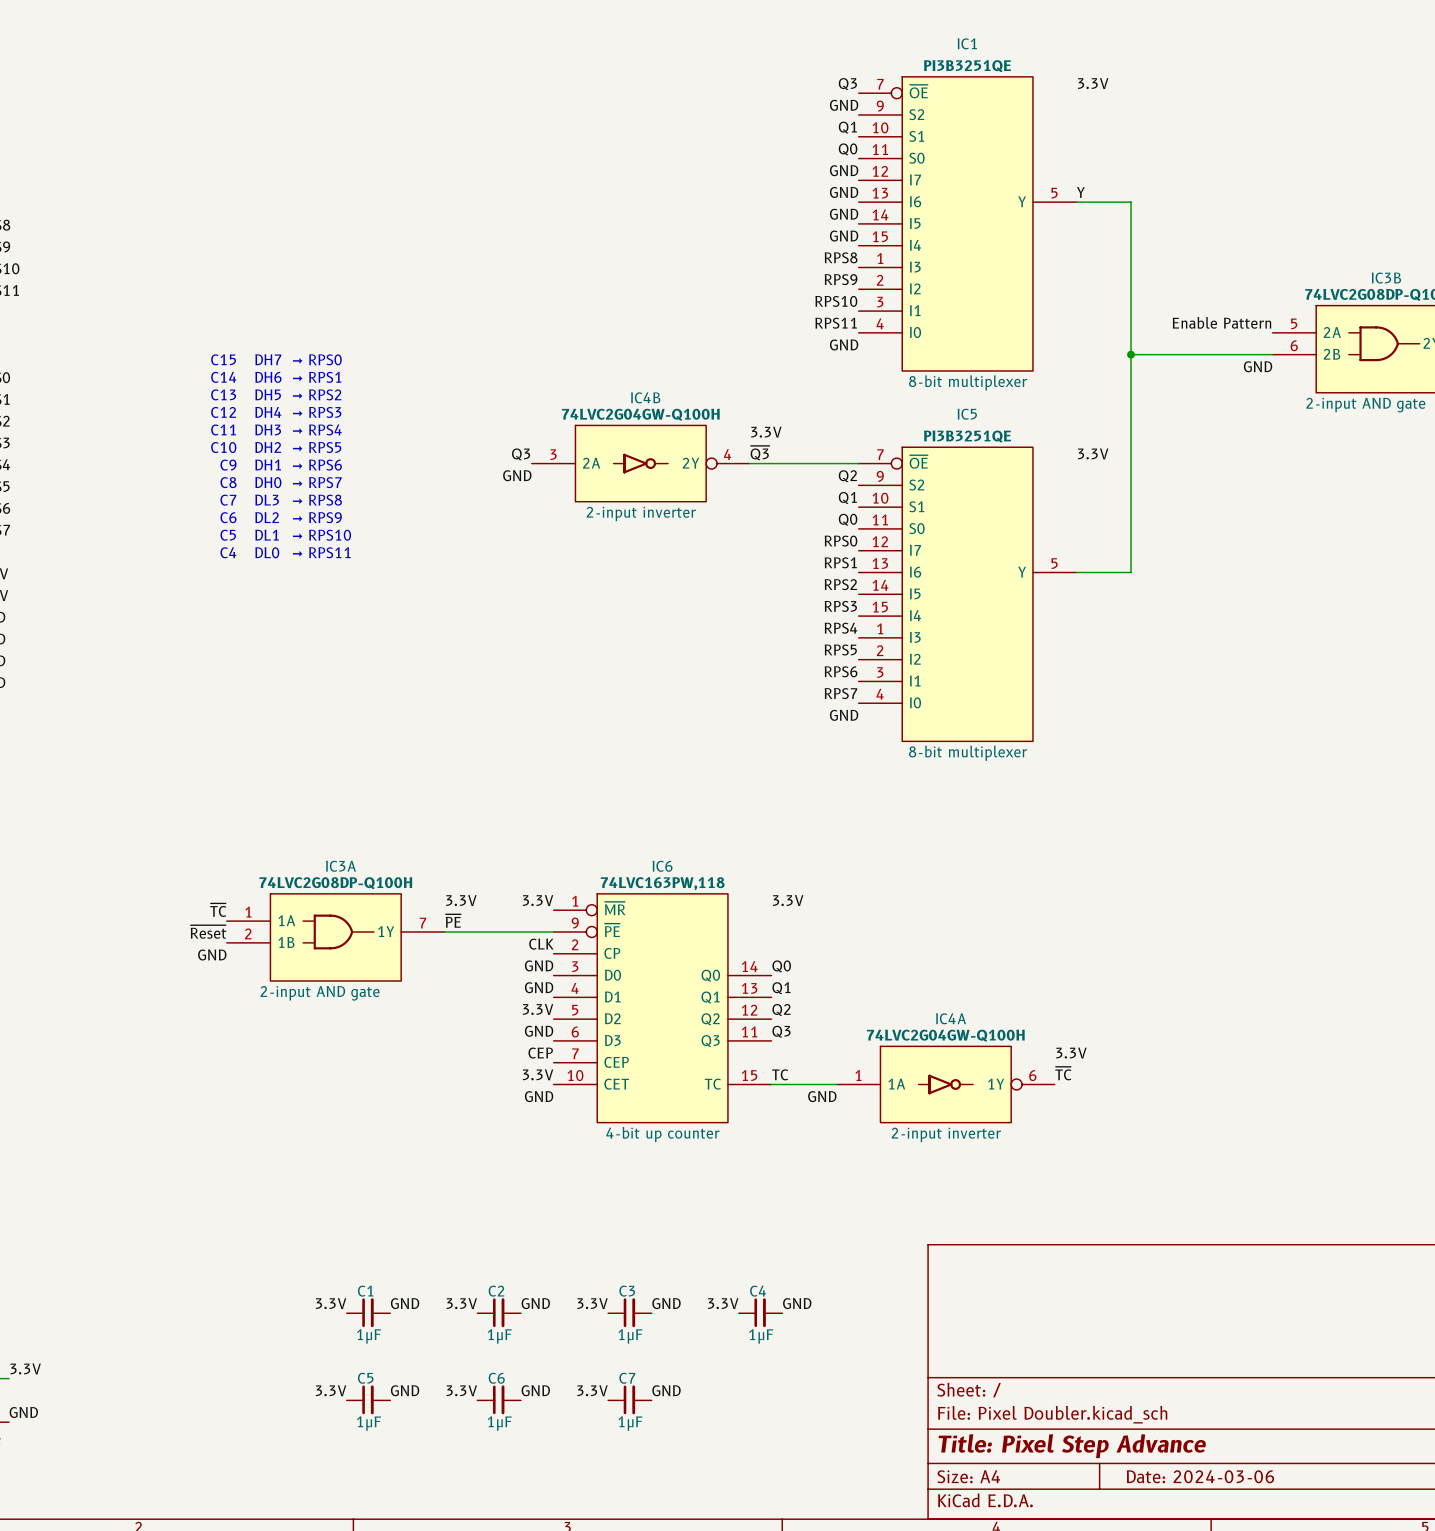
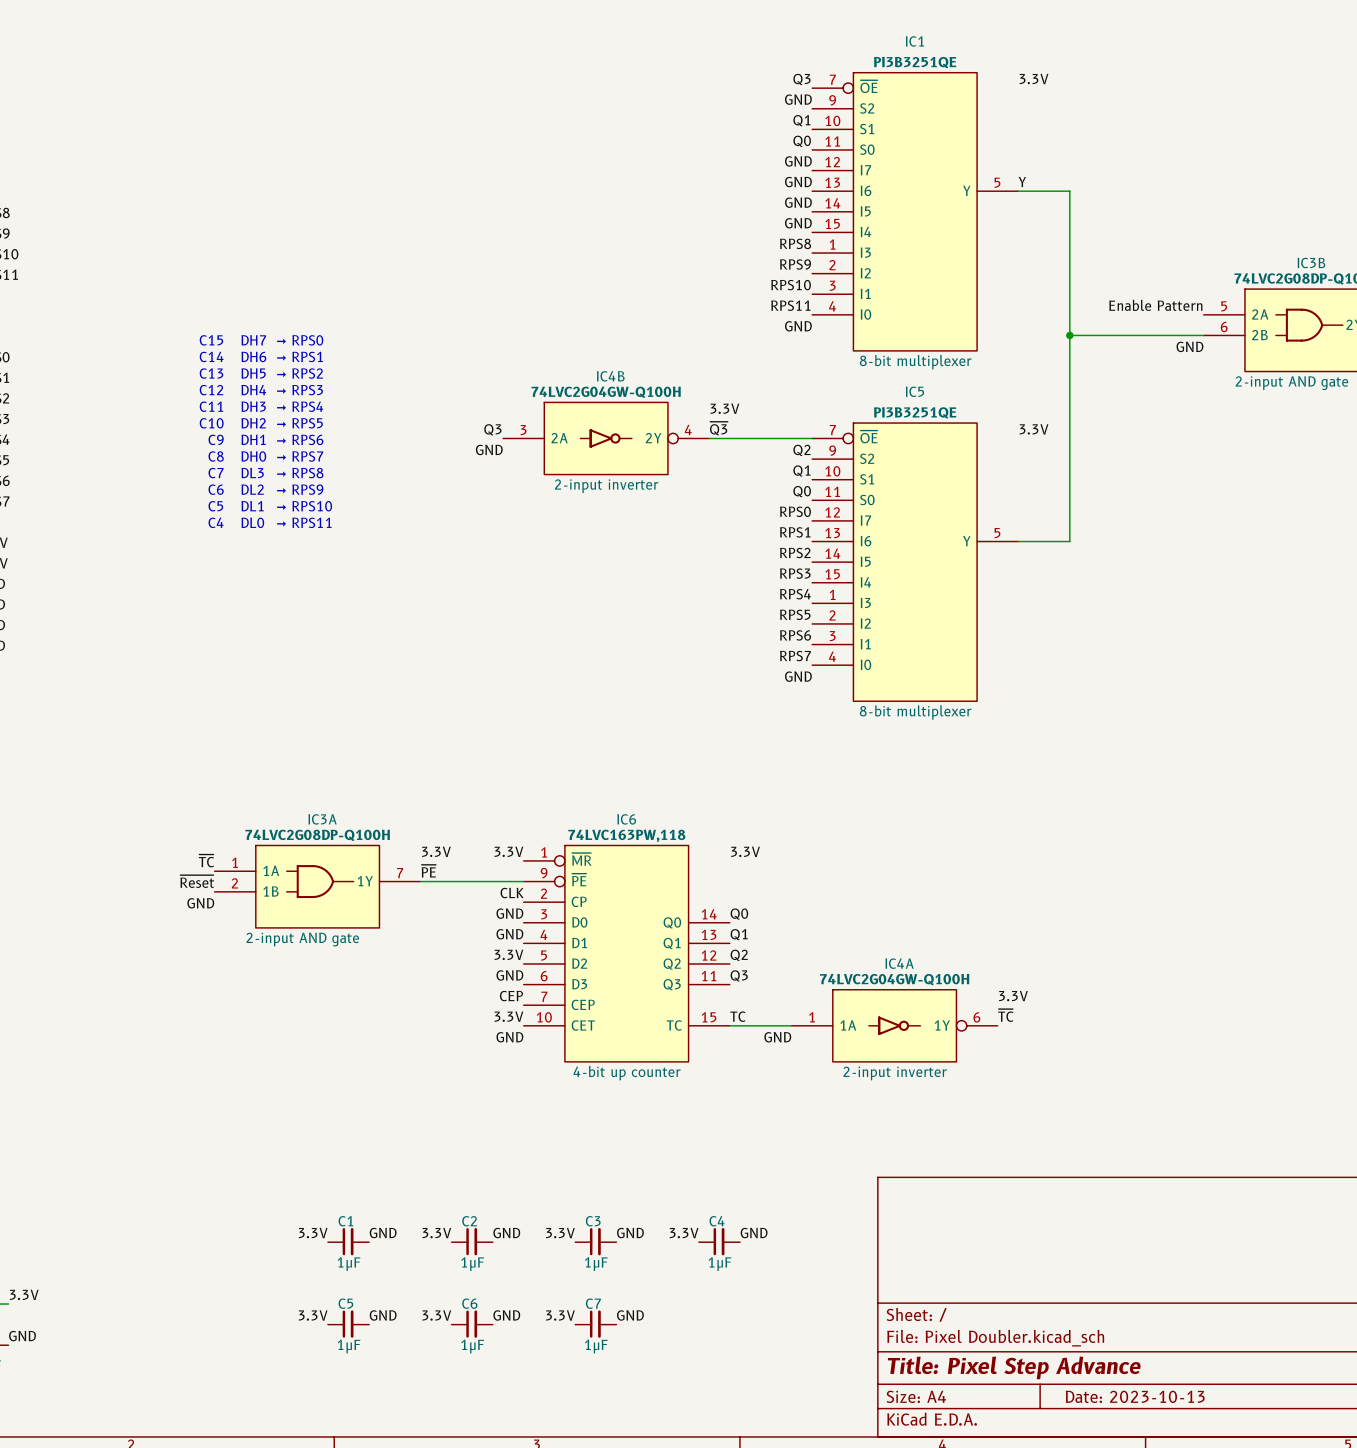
title block: Date: 2024-03-06 (1200, 1476) -> Date: 2023-10-13 (1135, 1396)

